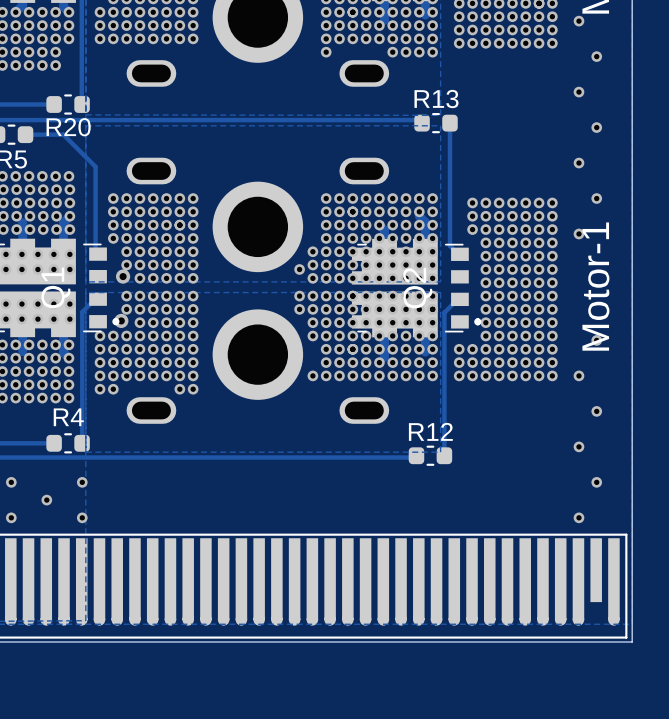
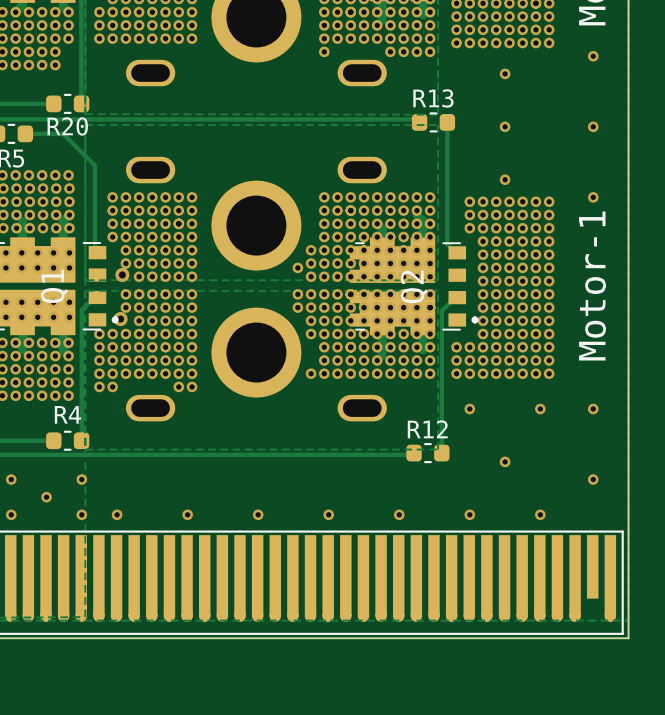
via: (578, 21) -> none
via: none -> (505, 73)
via: (578, 92) -> none
via: none -> (505, 126)
via: (578, 163) -> none
via: none -> (505, 179)
via: (578, 234) -> none
via: (596, 340) -> none
via: (578, 375) -> none
via: none -> (469, 408)
via: none -> (540, 408)
via: (578, 446) -> none
via: none -> (505, 461)
via: none -> (117, 514)
via: none -> (187, 514)
via: none -> (258, 514)
via: none -> (328, 514)
via: none -> (399, 514)
via: none -> (469, 514)
via position: (578, 517) -> (540, 514)

